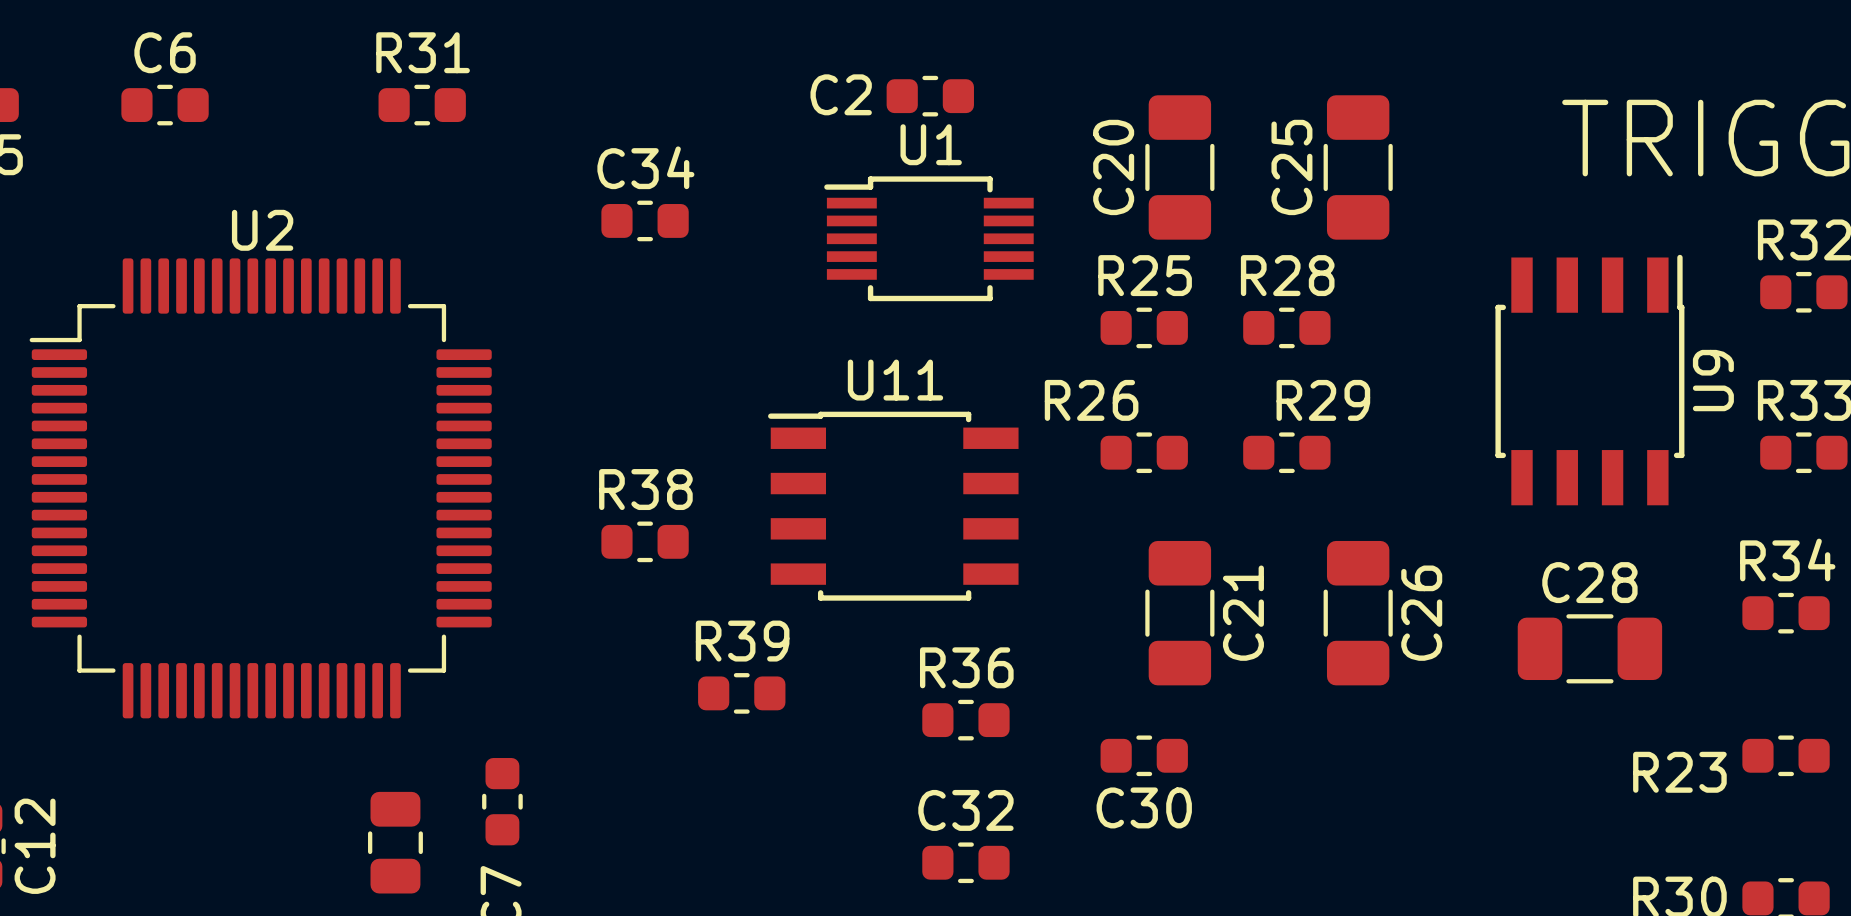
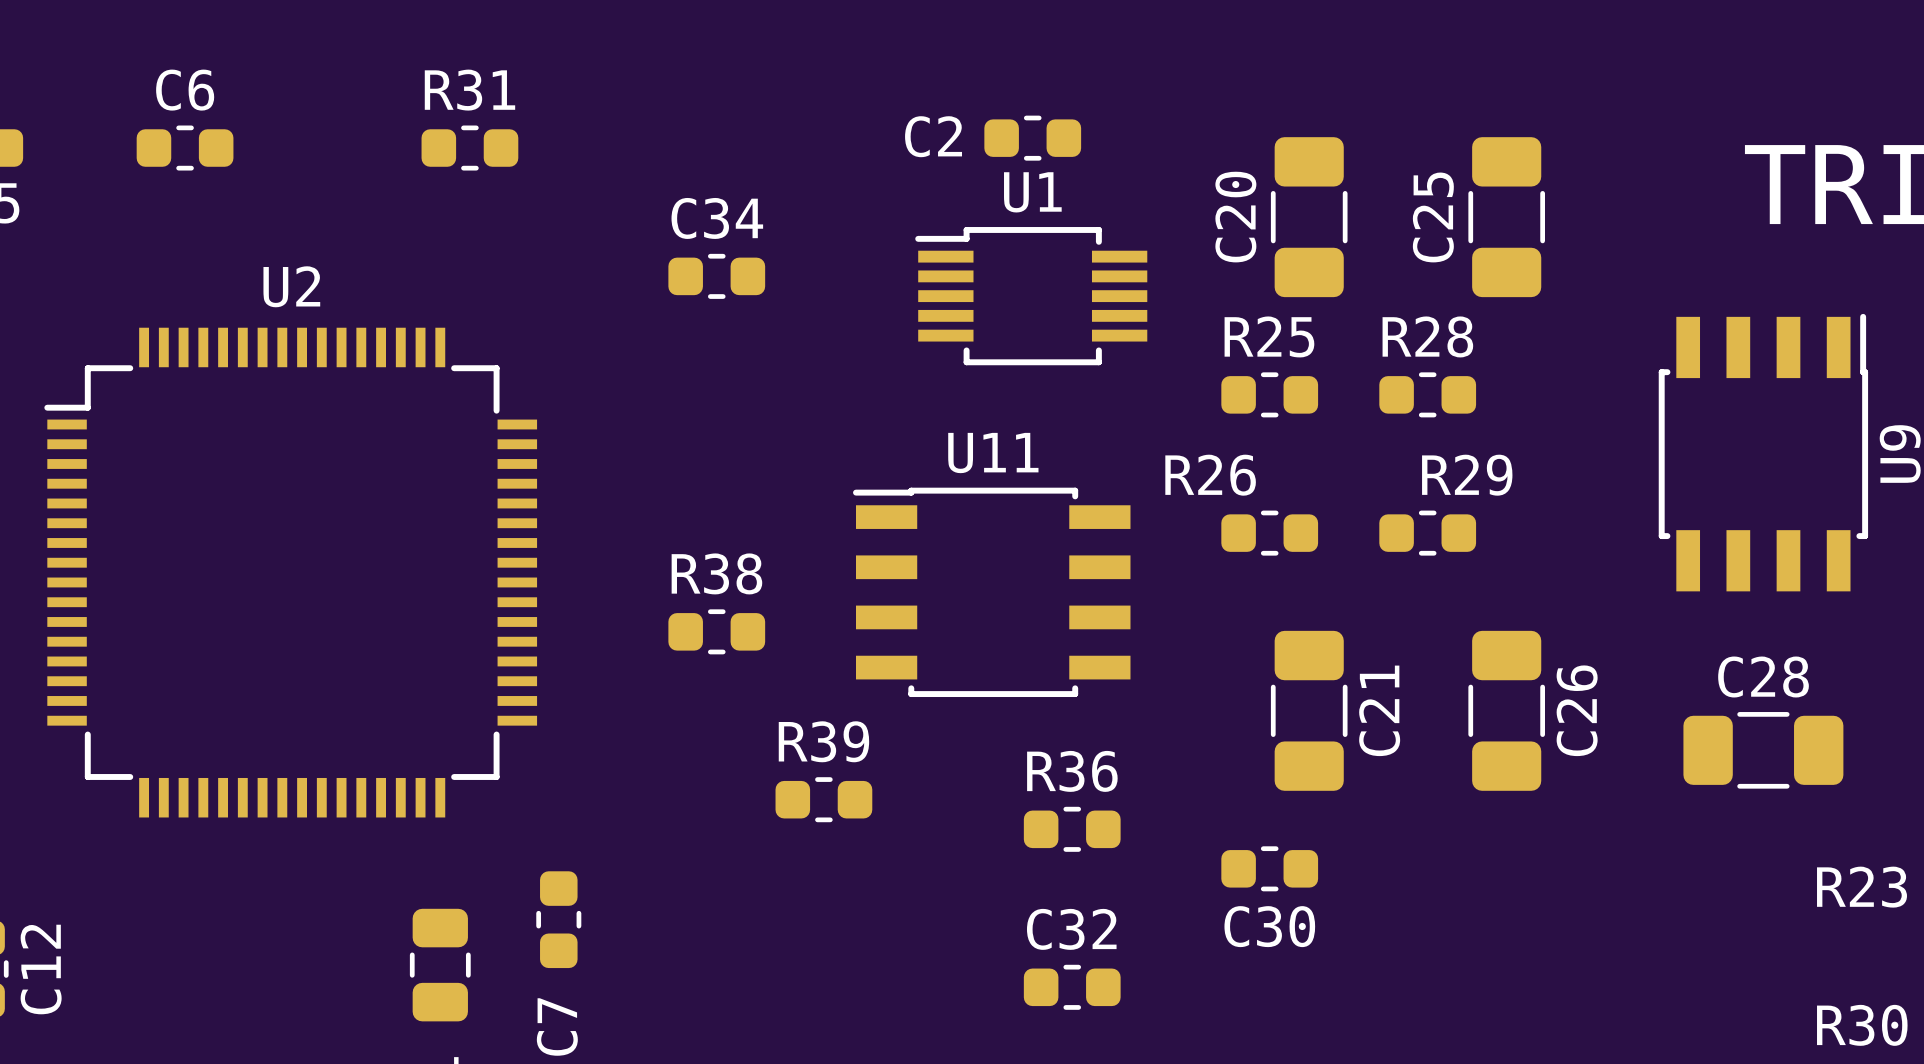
U2 footprint: [29, 258, 492, 719] -> [44, 327, 538, 818]

